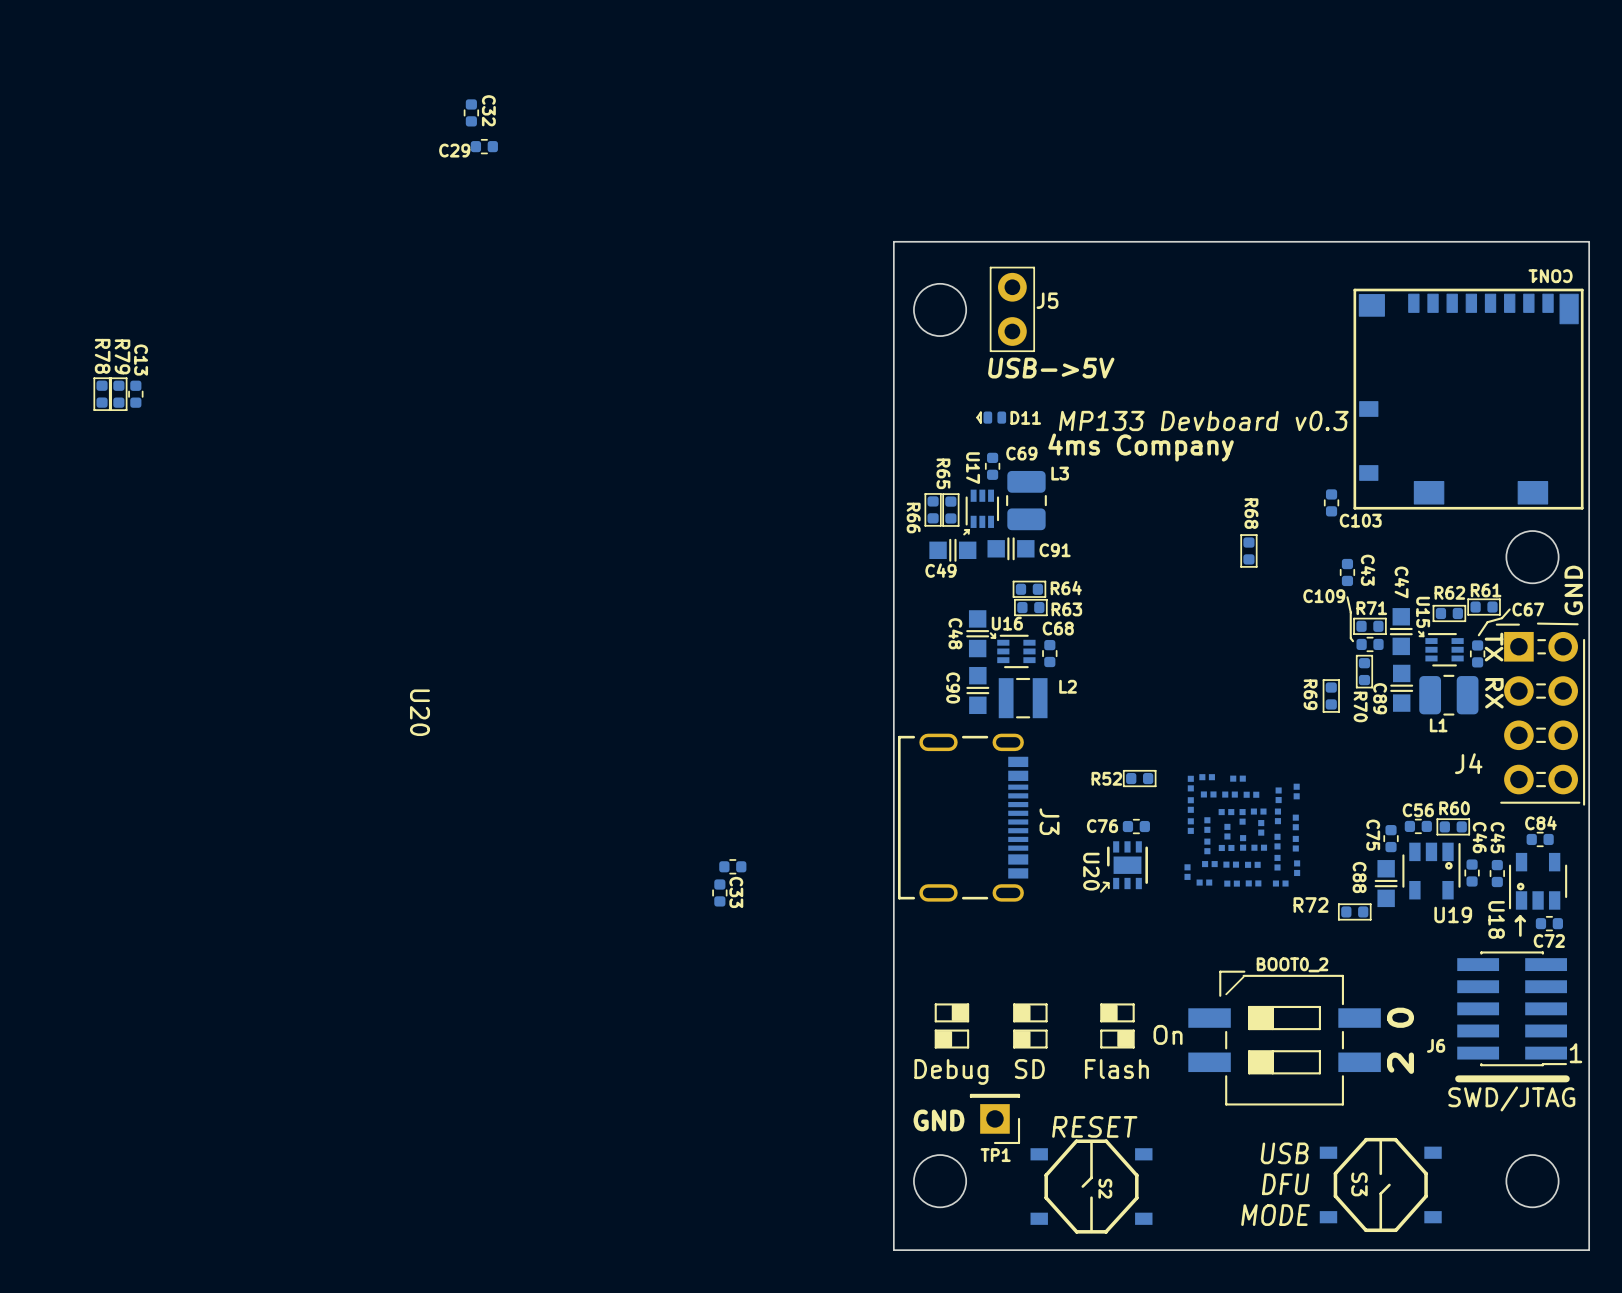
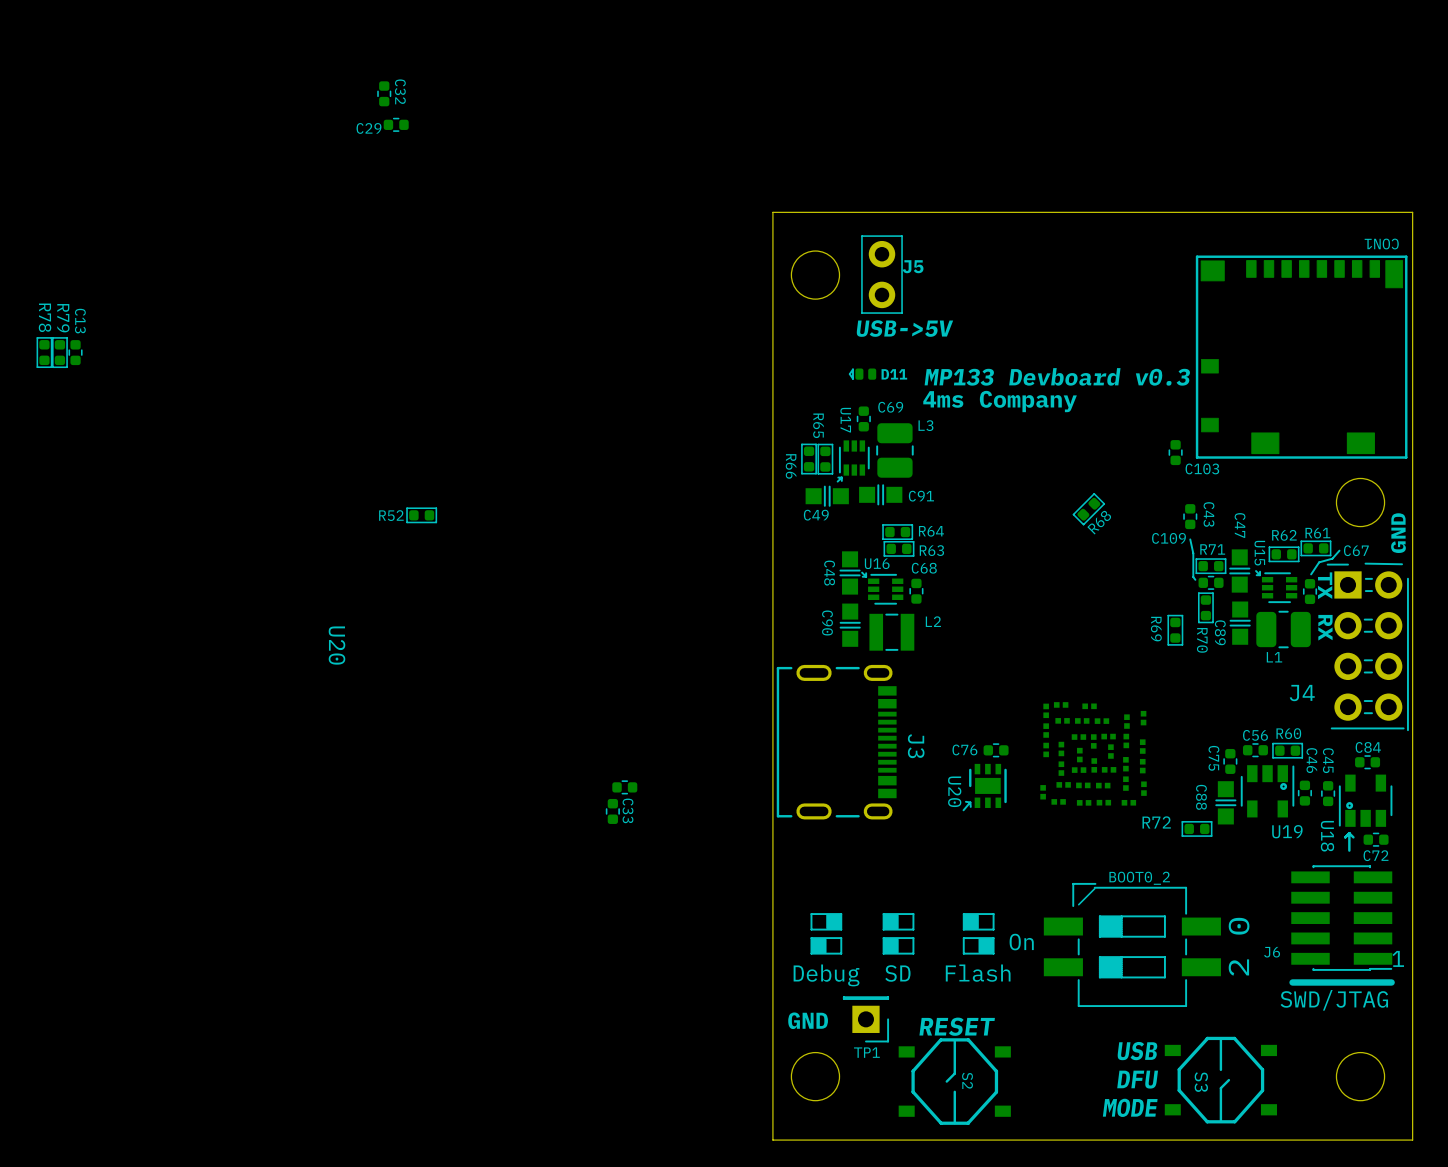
R68 name position: R68 (1251, 513) -> R68 (1099, 522)
R68 rotation: 0° (1248, 550) -> 45° clockwise (1088, 509)
R52 position: (1139, 778) -> (421, 515)

